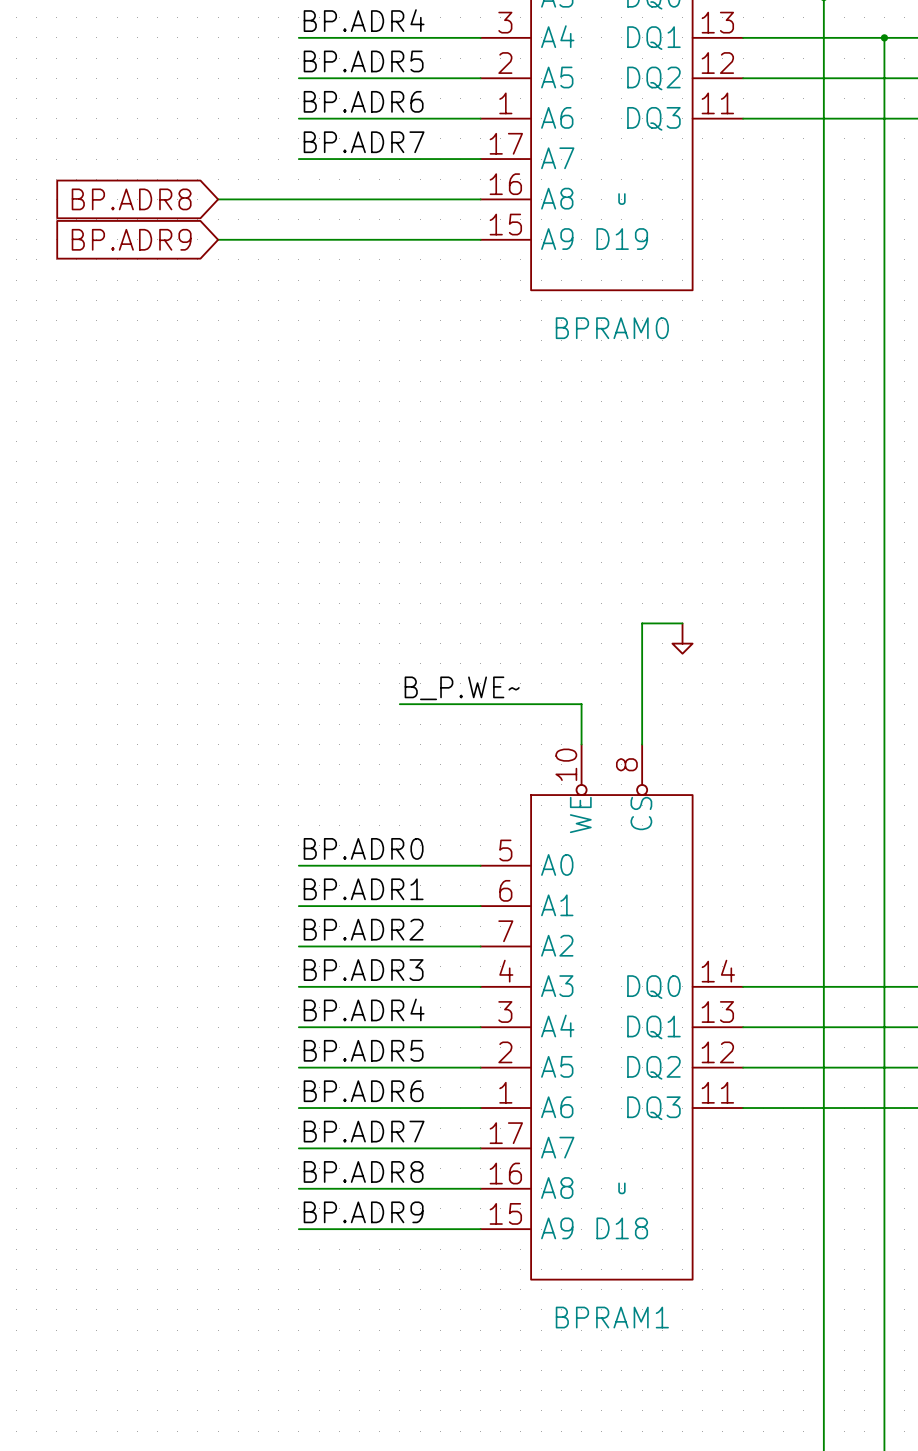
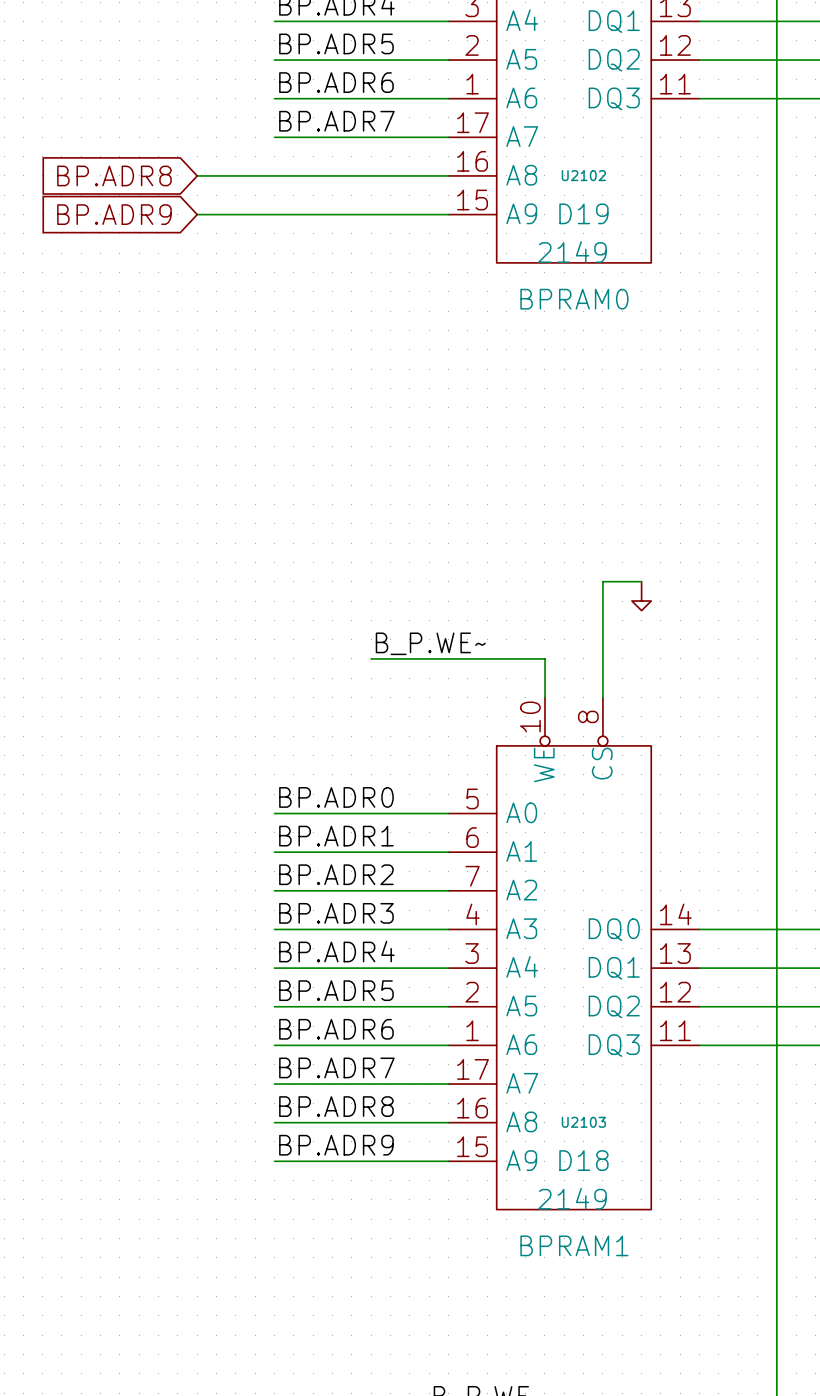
U name: U (621, 199) -> U2102 (583, 175)
U value: none -> 2149 (572, 252)
U name: U (621, 1188) -> U2103 (583, 1122)
U value: none -> 2149 (572, 1198)

